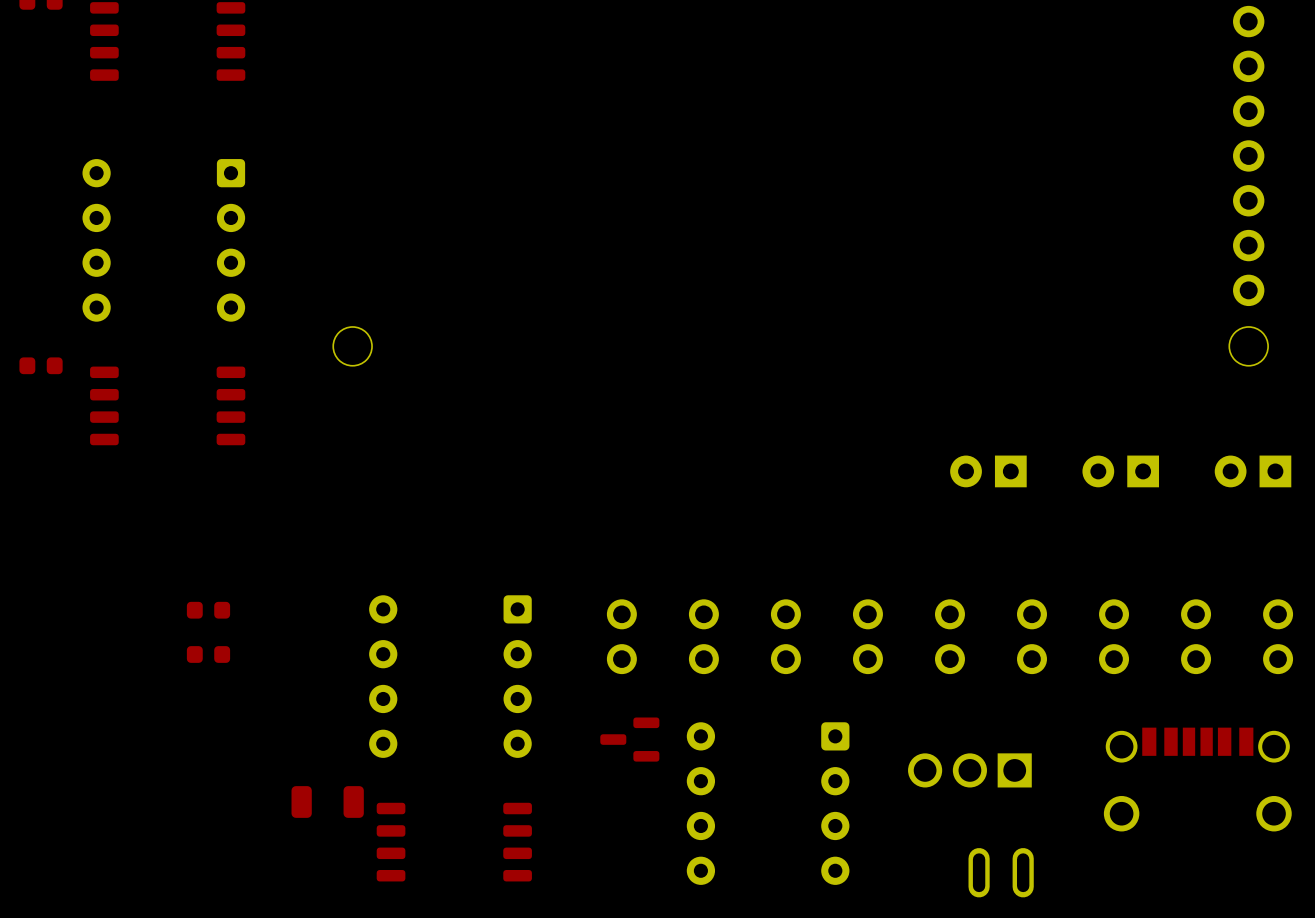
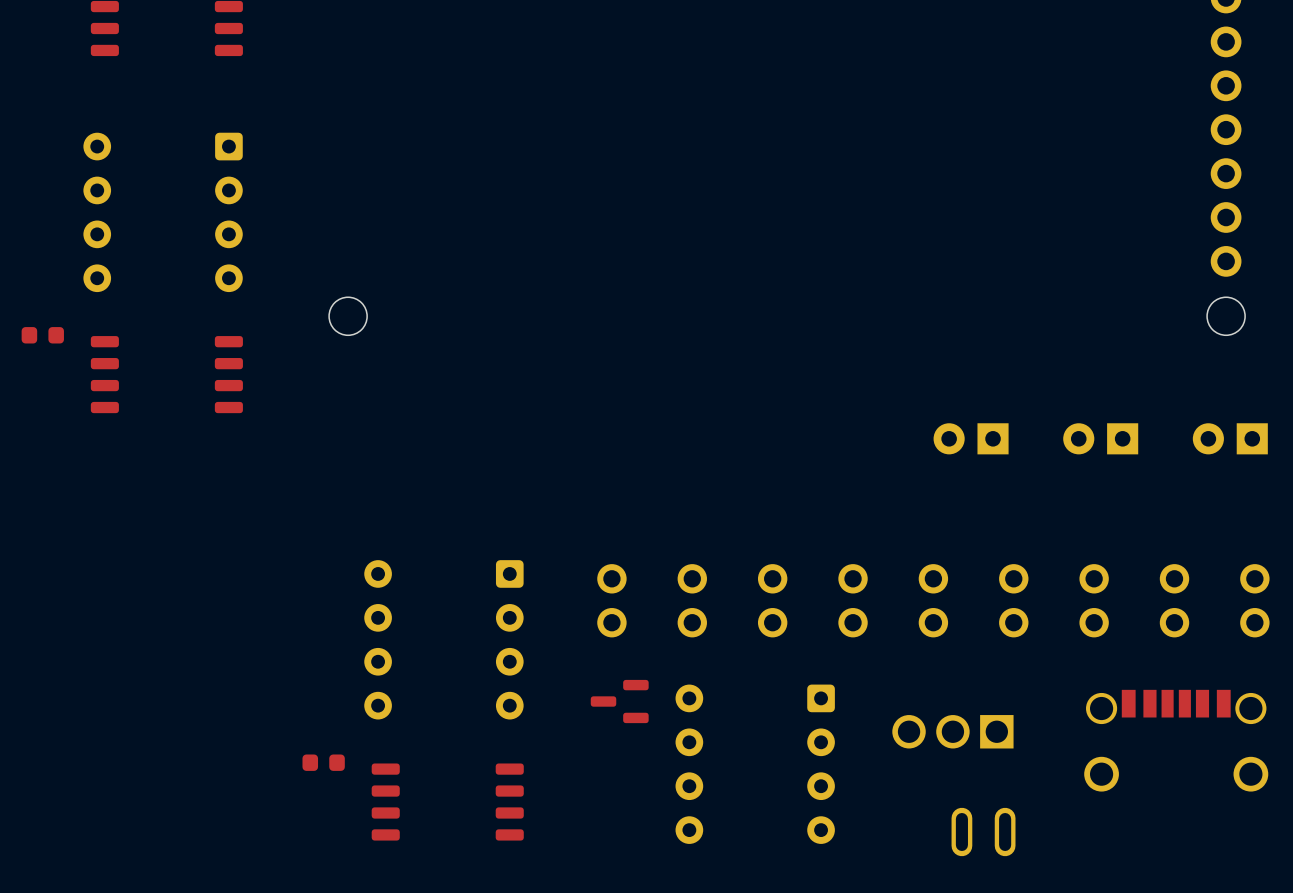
part: (208, 610) -> none
part: (208, 654) -> none
part footprint: [291, 786, 364, 818] -> [302, 754, 345, 771]

